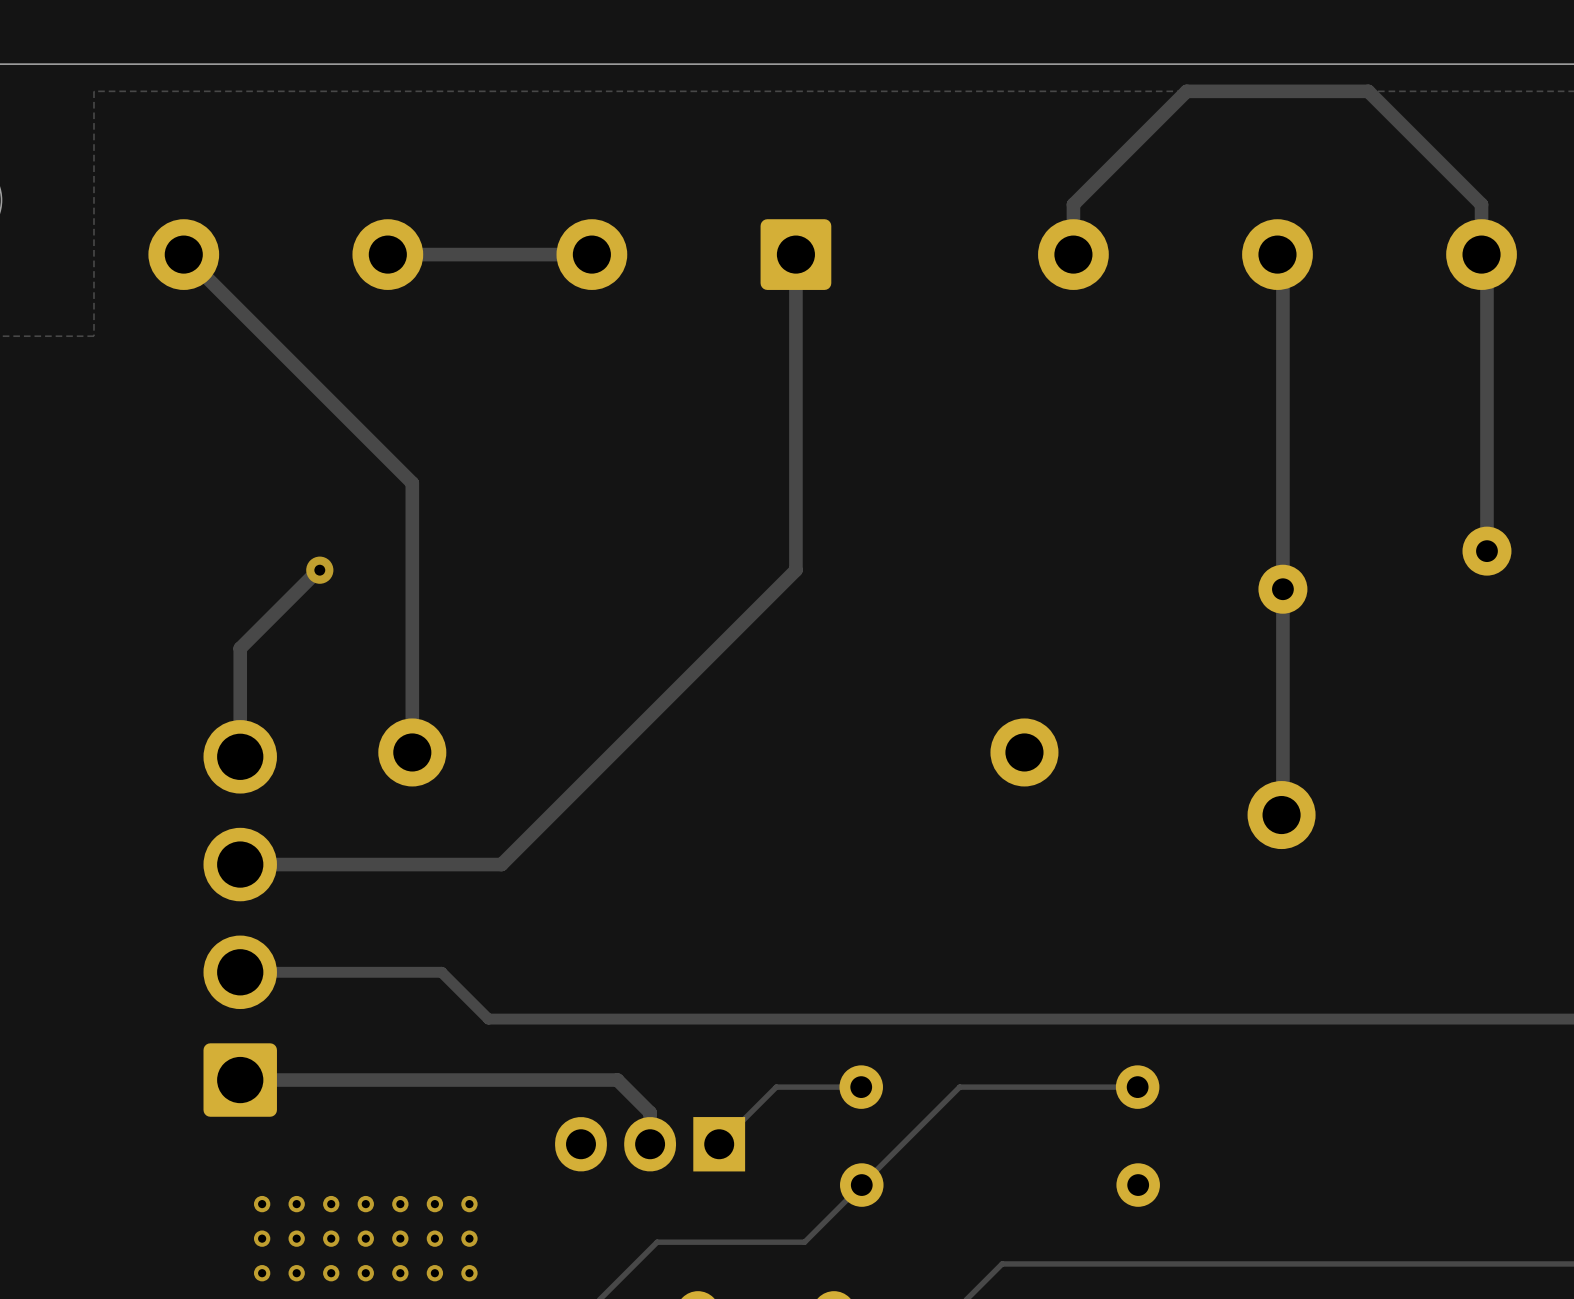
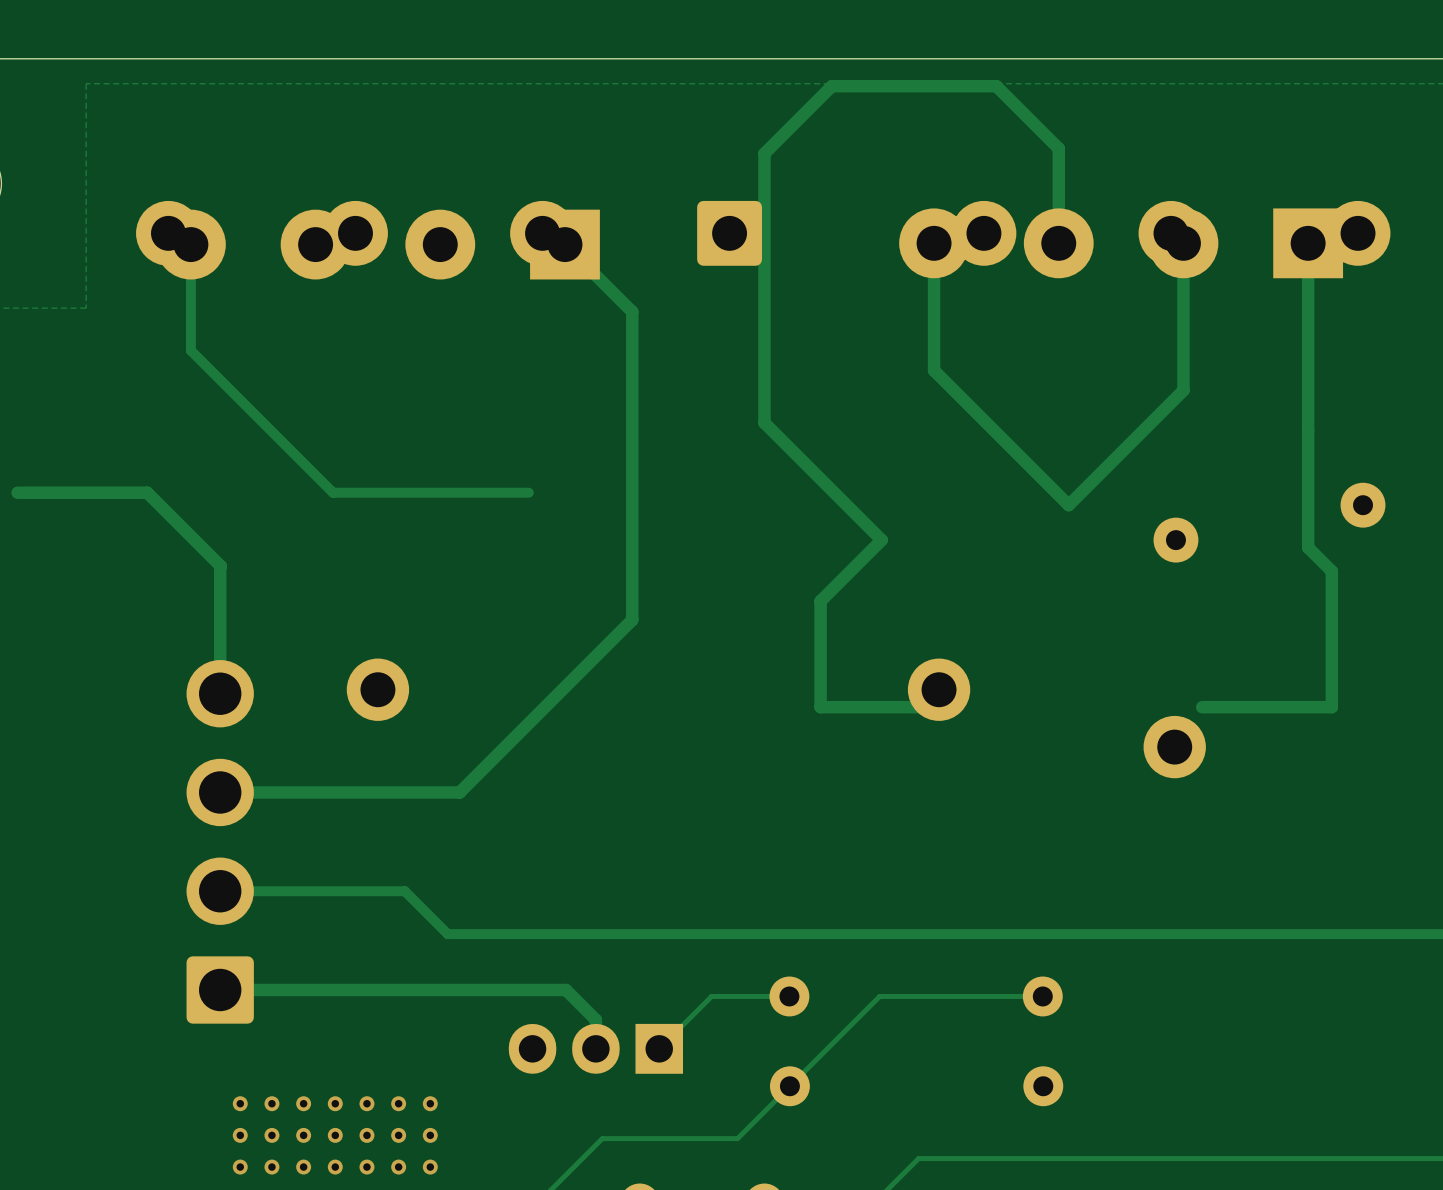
track: (183, 254) (412, 483) (412, 752) -> none
track: (591, 254) (387, 254) -> none
track: (795, 254) (795, 570) (689, 676) -> (564, 244) (632, 311) (632, 619)
track: (1073, 254) (1073, 204) (1186, 91) (1368, 91) (1481, 204) (1481, 254) (1486, 260) (1486, 551) -> none
track: (1277, 254) (1282, 260) (1281, 815) -> none
track: none -> (1058, 243) (1058, 148) (996, 86) (831, 86) (764, 153) (764, 422) (881, 540) (820, 601) (820, 707) (950, 707)
part: none -> (1121, 243)
track: none -> (1183, 243) (1183, 390) (1068, 505) (934, 370) (934, 243)
track: none -> (1308, 243) (1308, 547) (1331, 571) (1331, 707) (1202, 707)
track: none -> (190, 244) (190, 350) (333, 492) (528, 492)
part: none -> (377, 244)
track: (319, 570) (240, 648) -> (17, 492) (147, 492) (220, 566) (220, 594)
via: (319, 570) -> none

